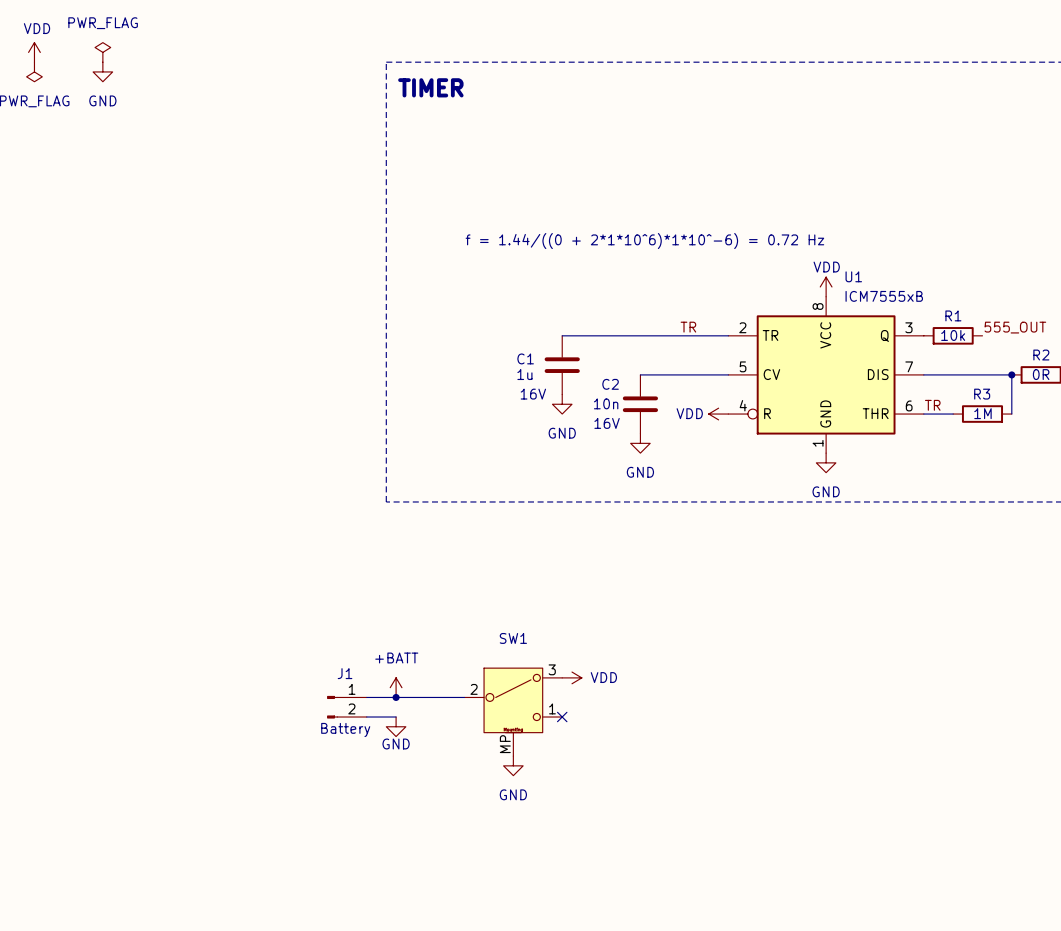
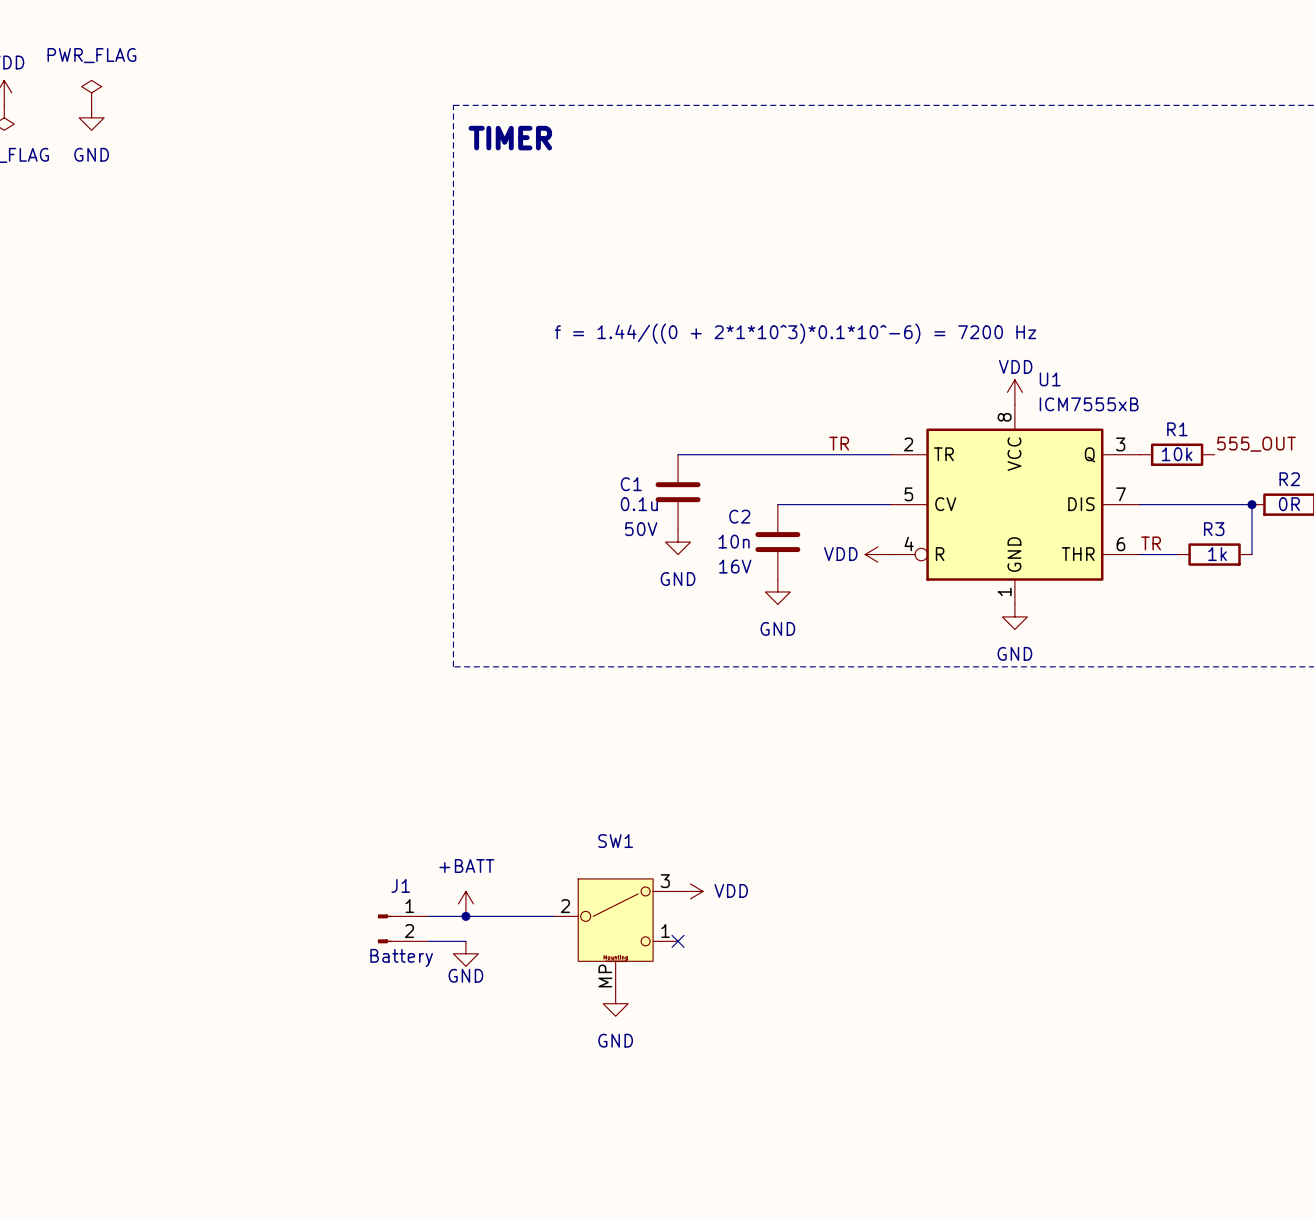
text: f = 1.44/((0 + 2*1*10^6)*1*10^-6) = 0.72 Hz (644, 241) -> f = 1.44/((0 + 2*1*10^3)*0.1*10^-6) = 7200 Hz (795, 333)
C1 value: 1u (524, 374) -> 0.1u (639, 504)
C1 text: 16V (533, 394) -> 50V (641, 529)
R3 value: 1M (982, 413) -> 1k (1217, 554)

